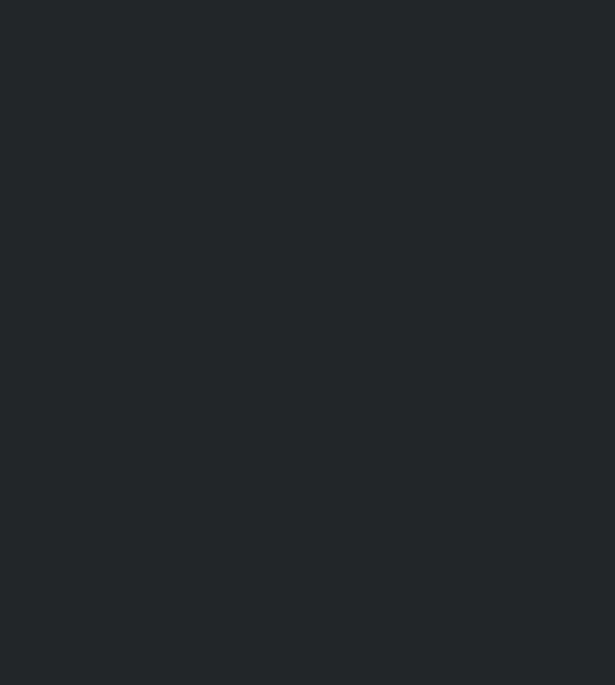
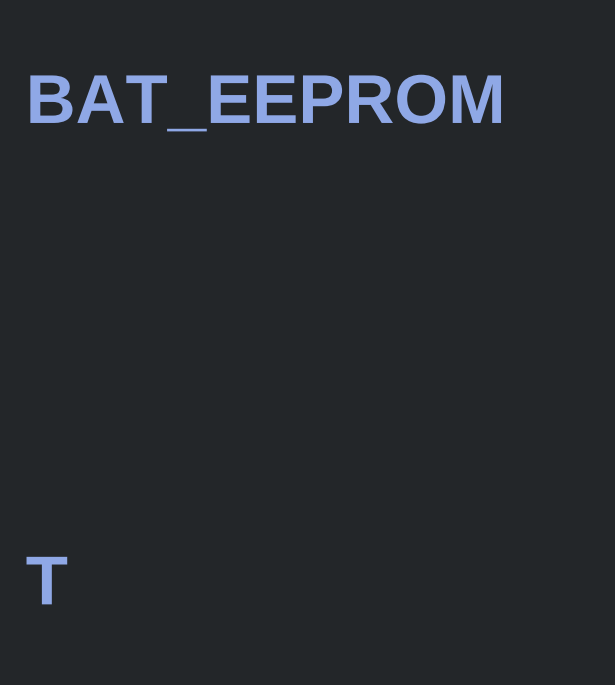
text: none -> BAT_EEPROM (265, 103)
text: none -> T (46, 580)

